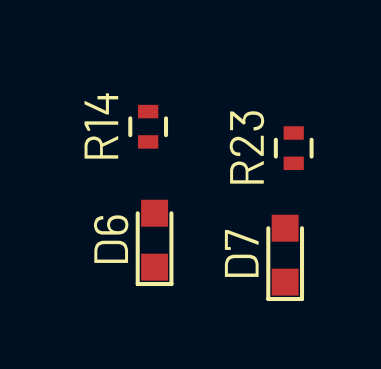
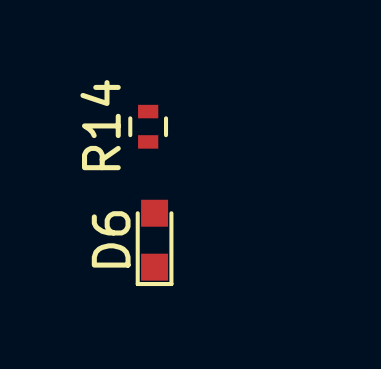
R23: (293, 148) -> none
D7: (285, 257) -> none

